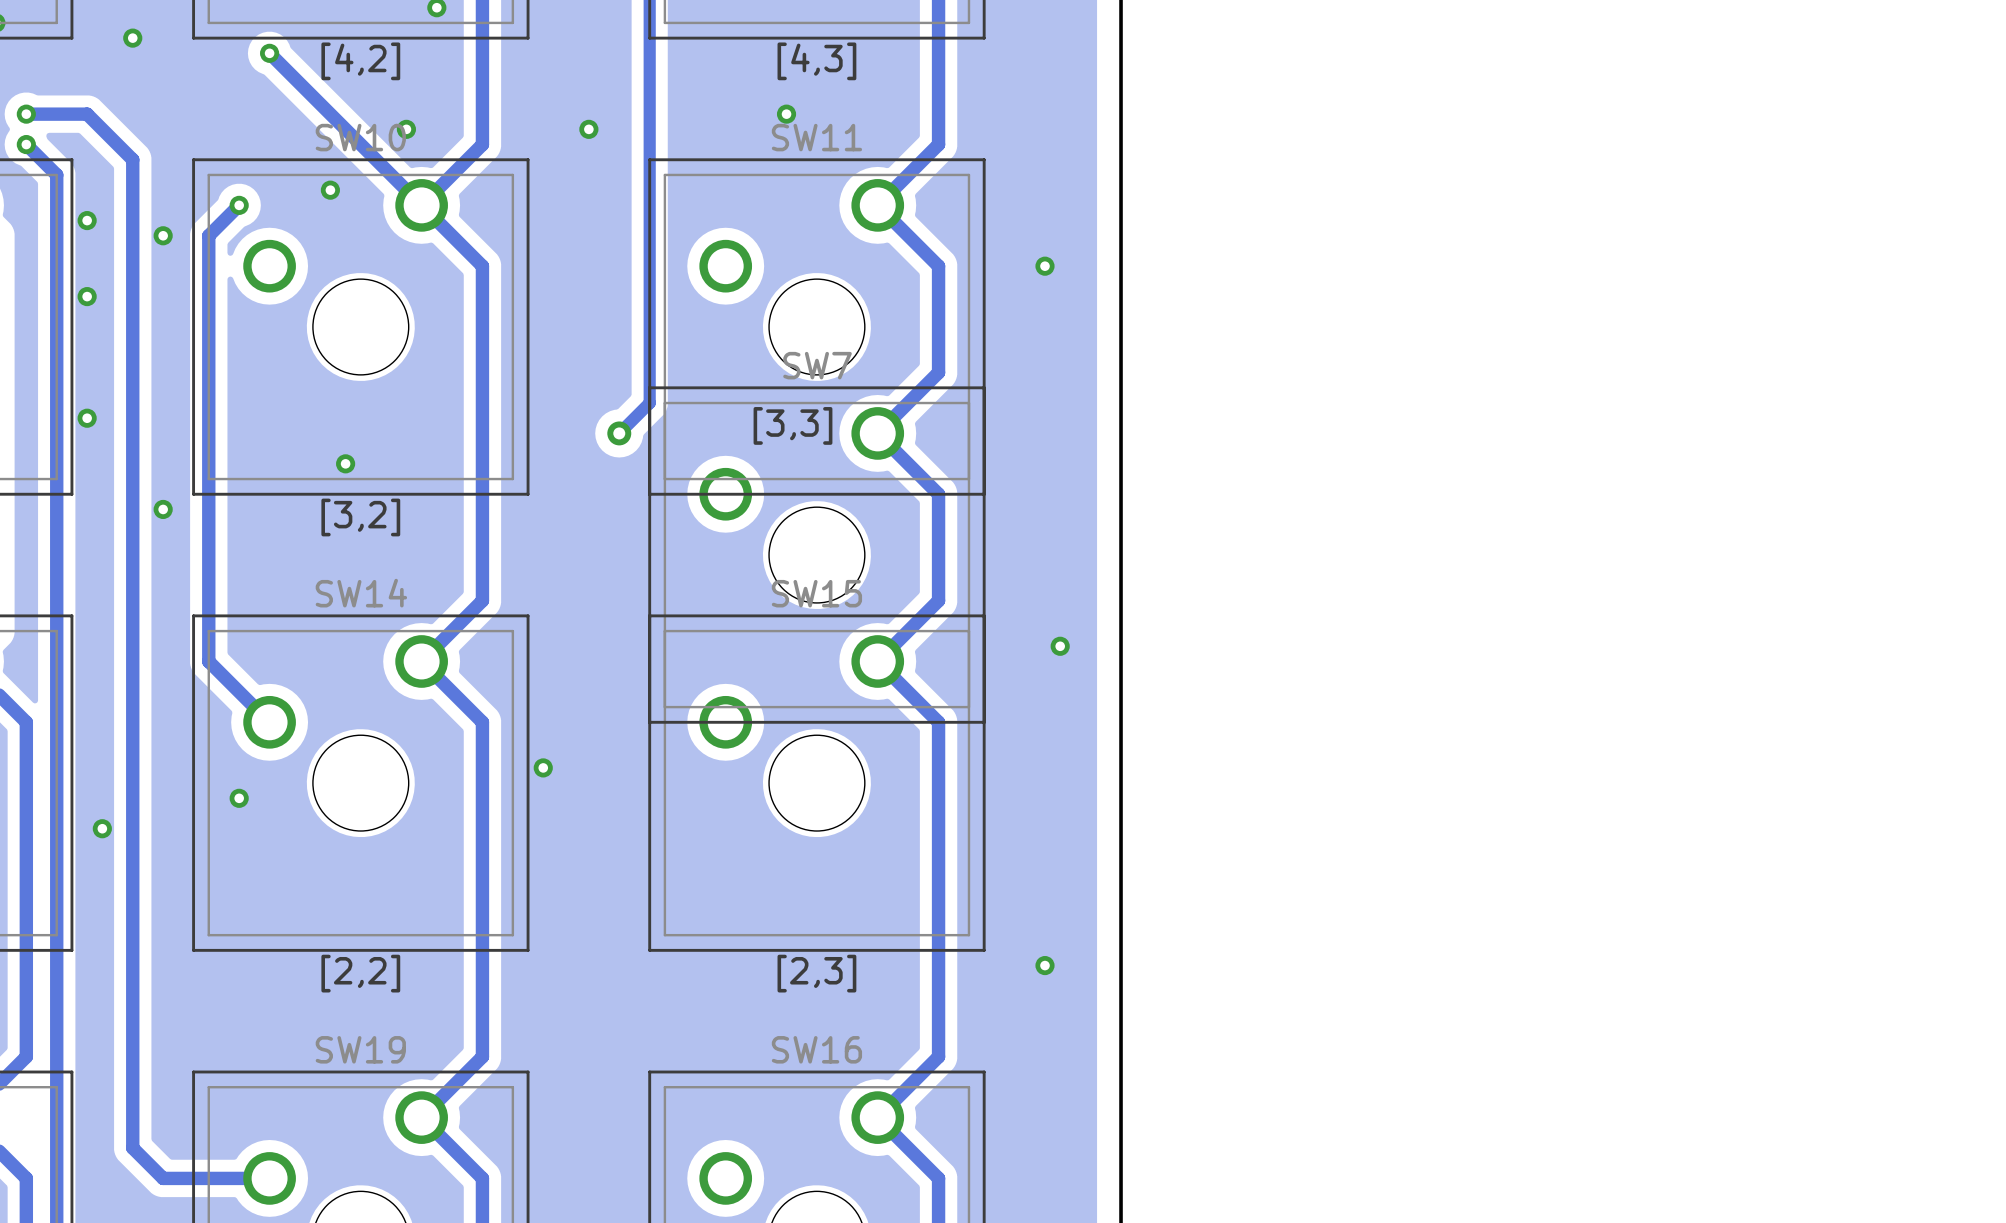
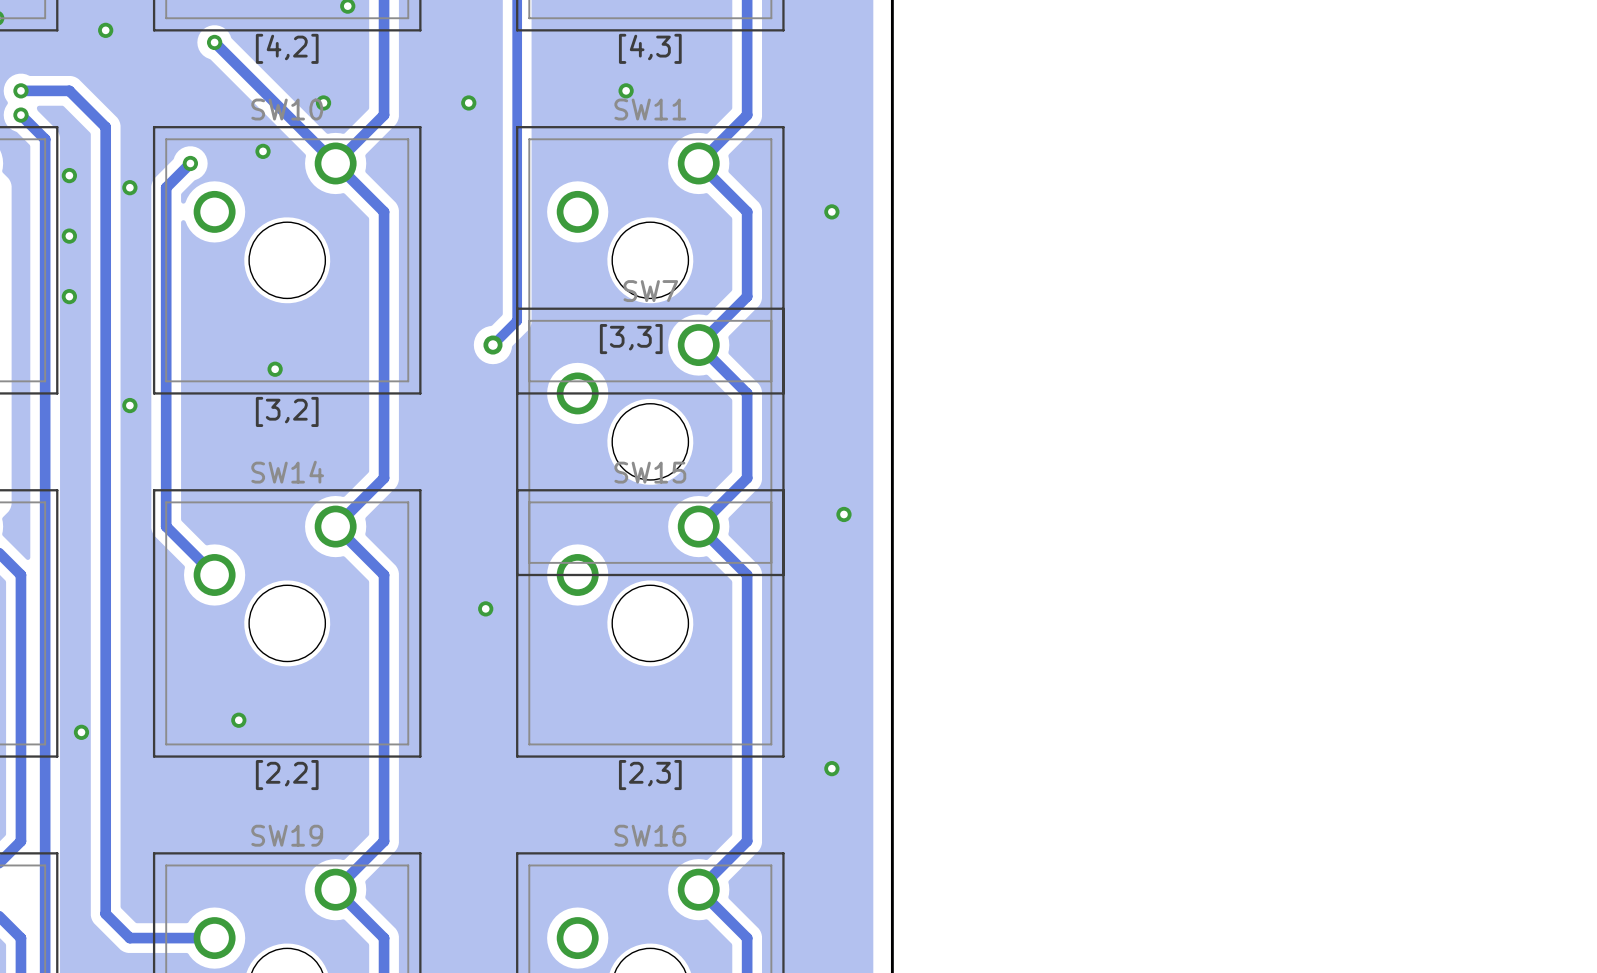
via position: (87, 418) -> (69, 296)
via position: (543, 767) -> (485, 608)
via: (239, 798) -> none
via position: (102, 828) -> (81, 732)
via: none -> (238, 720)

